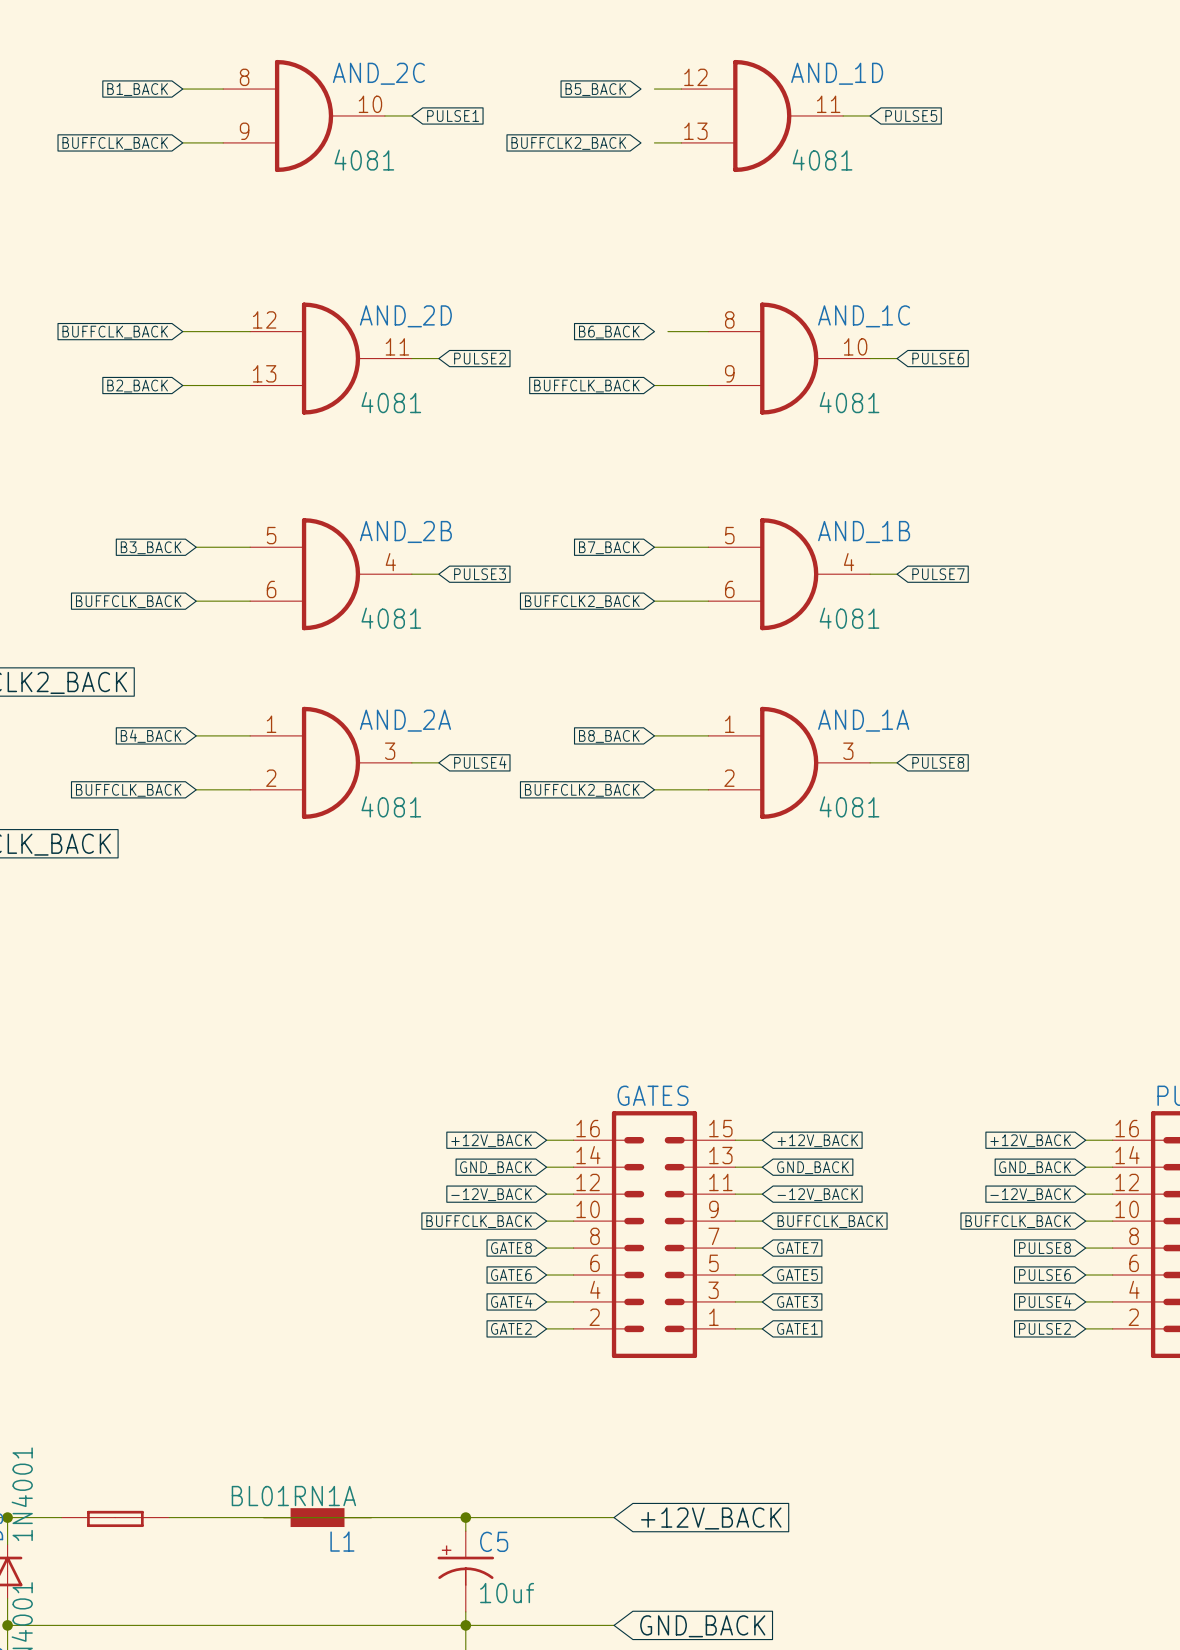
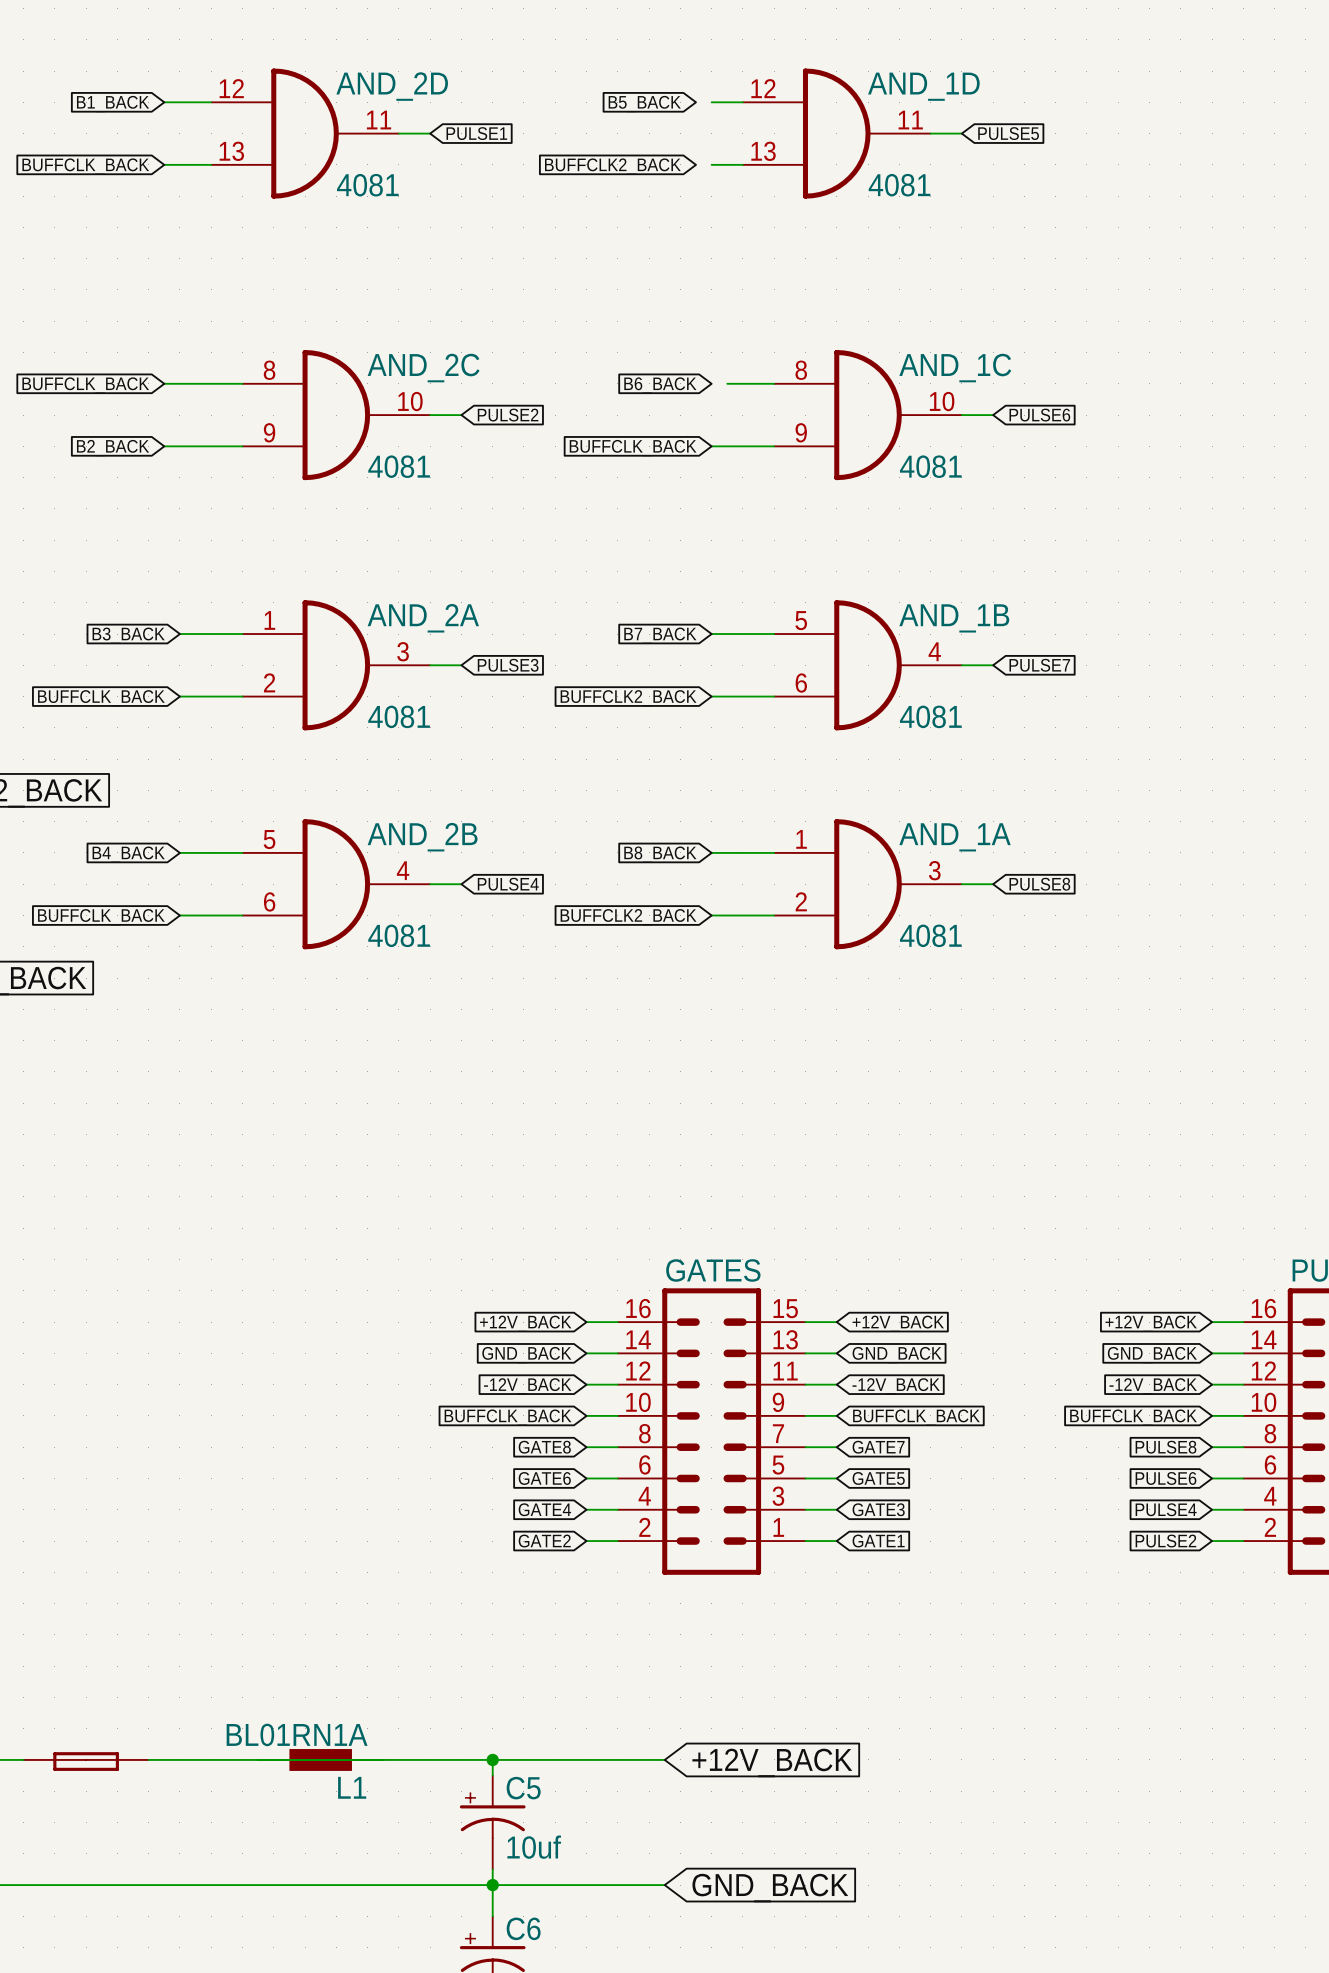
AND_2C position: (304, 115) -> (336, 415)
AND_2D position: (331, 358) -> (305, 133)
AND_2B position: (331, 574) -> (336, 884)
AND_2A position: (331, 762) -> (336, 665)

